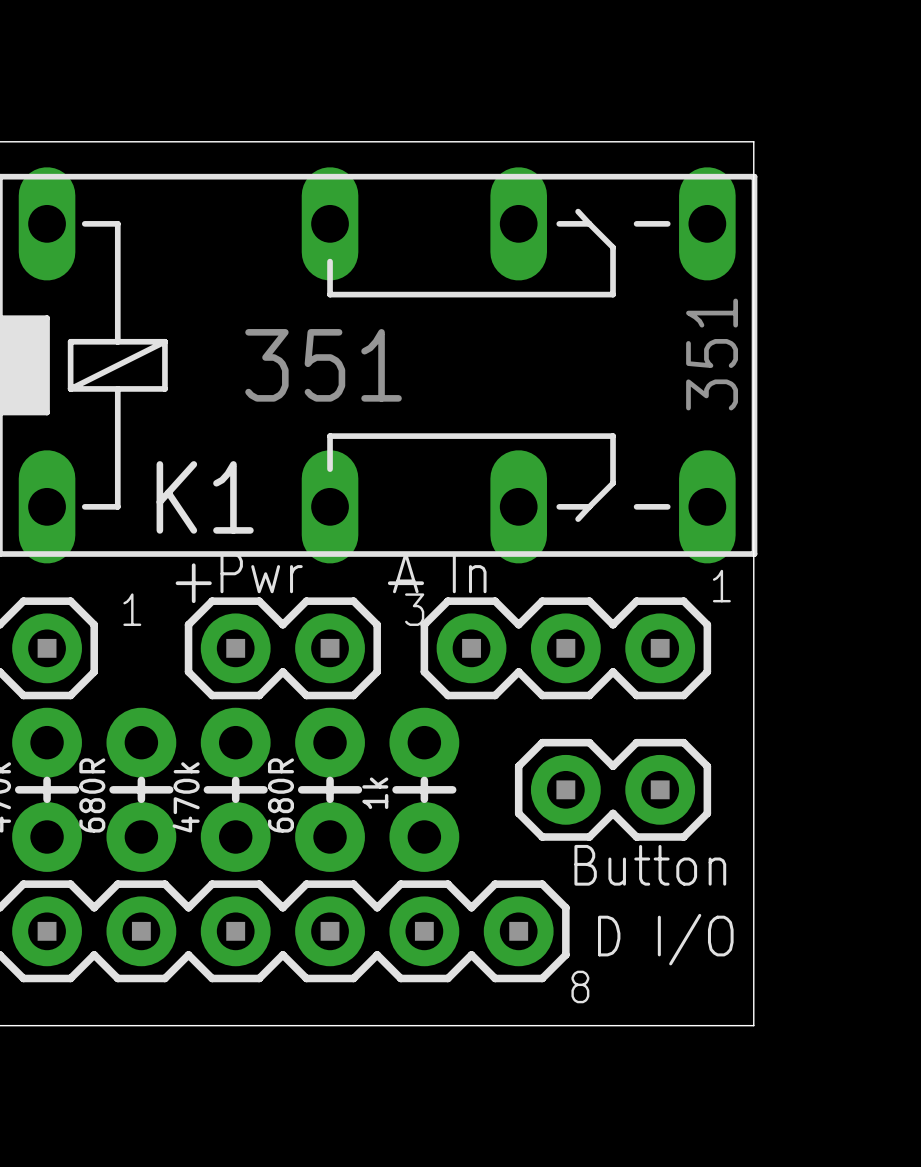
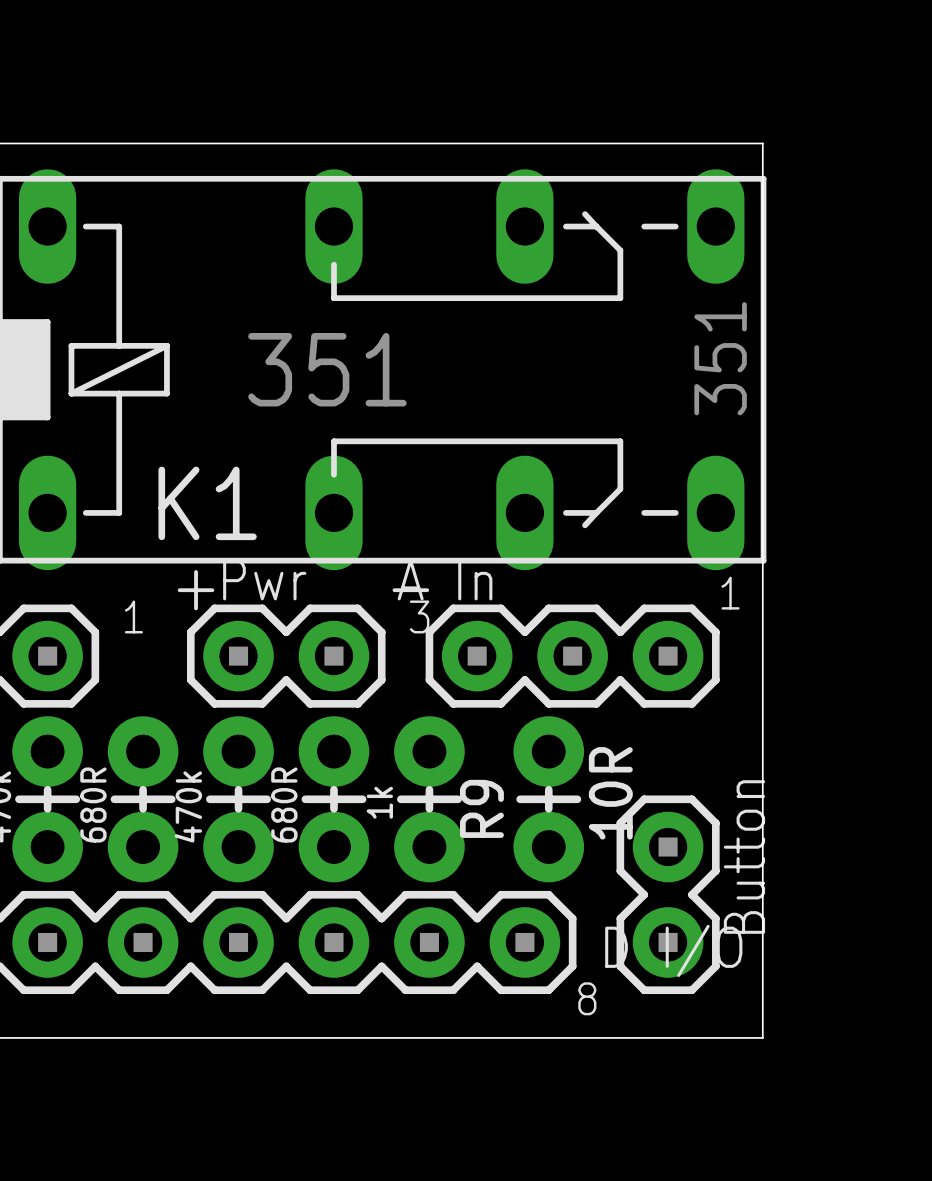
R9: none -> 10R (548, 799)
part rotation: 0° (613, 789) -> 90° clockwise (668, 894)
part value position: Button (650, 865) -> Button (744, 857)

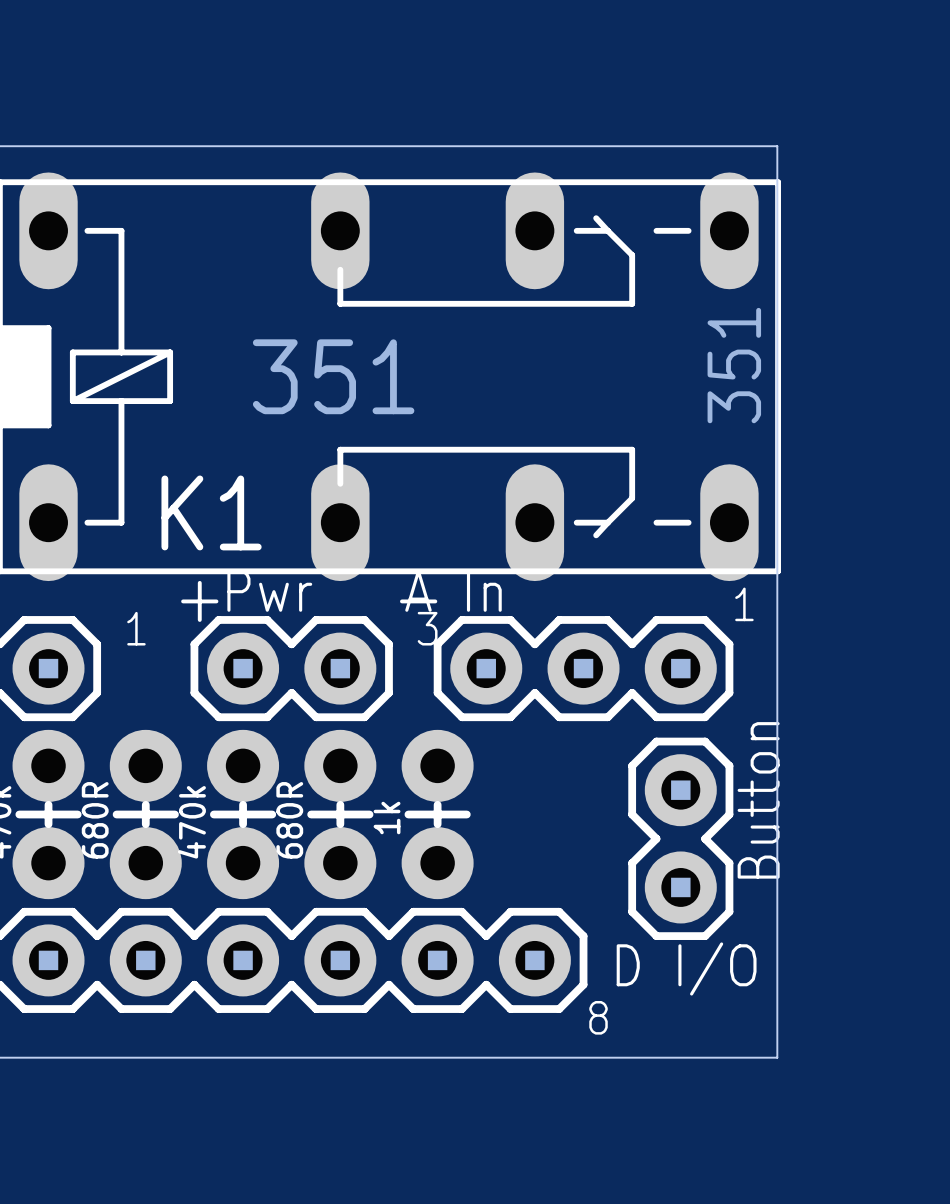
R9: 10R (548, 799) -> none
part position: (668, 894) -> (680, 838)

